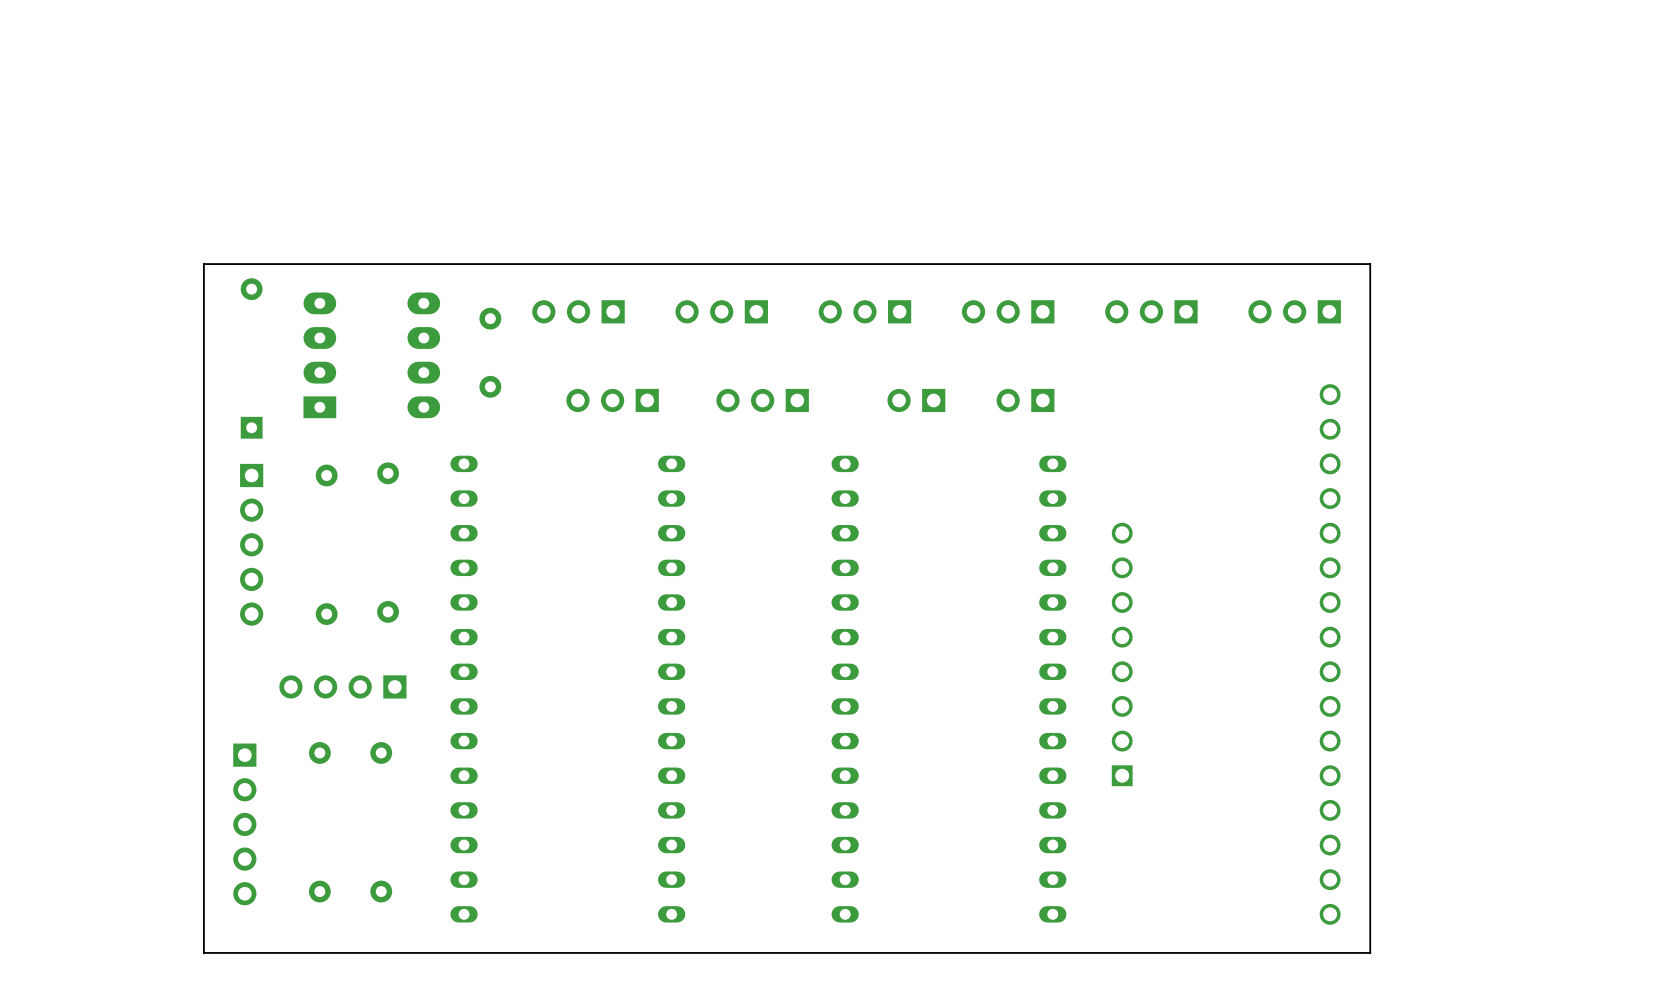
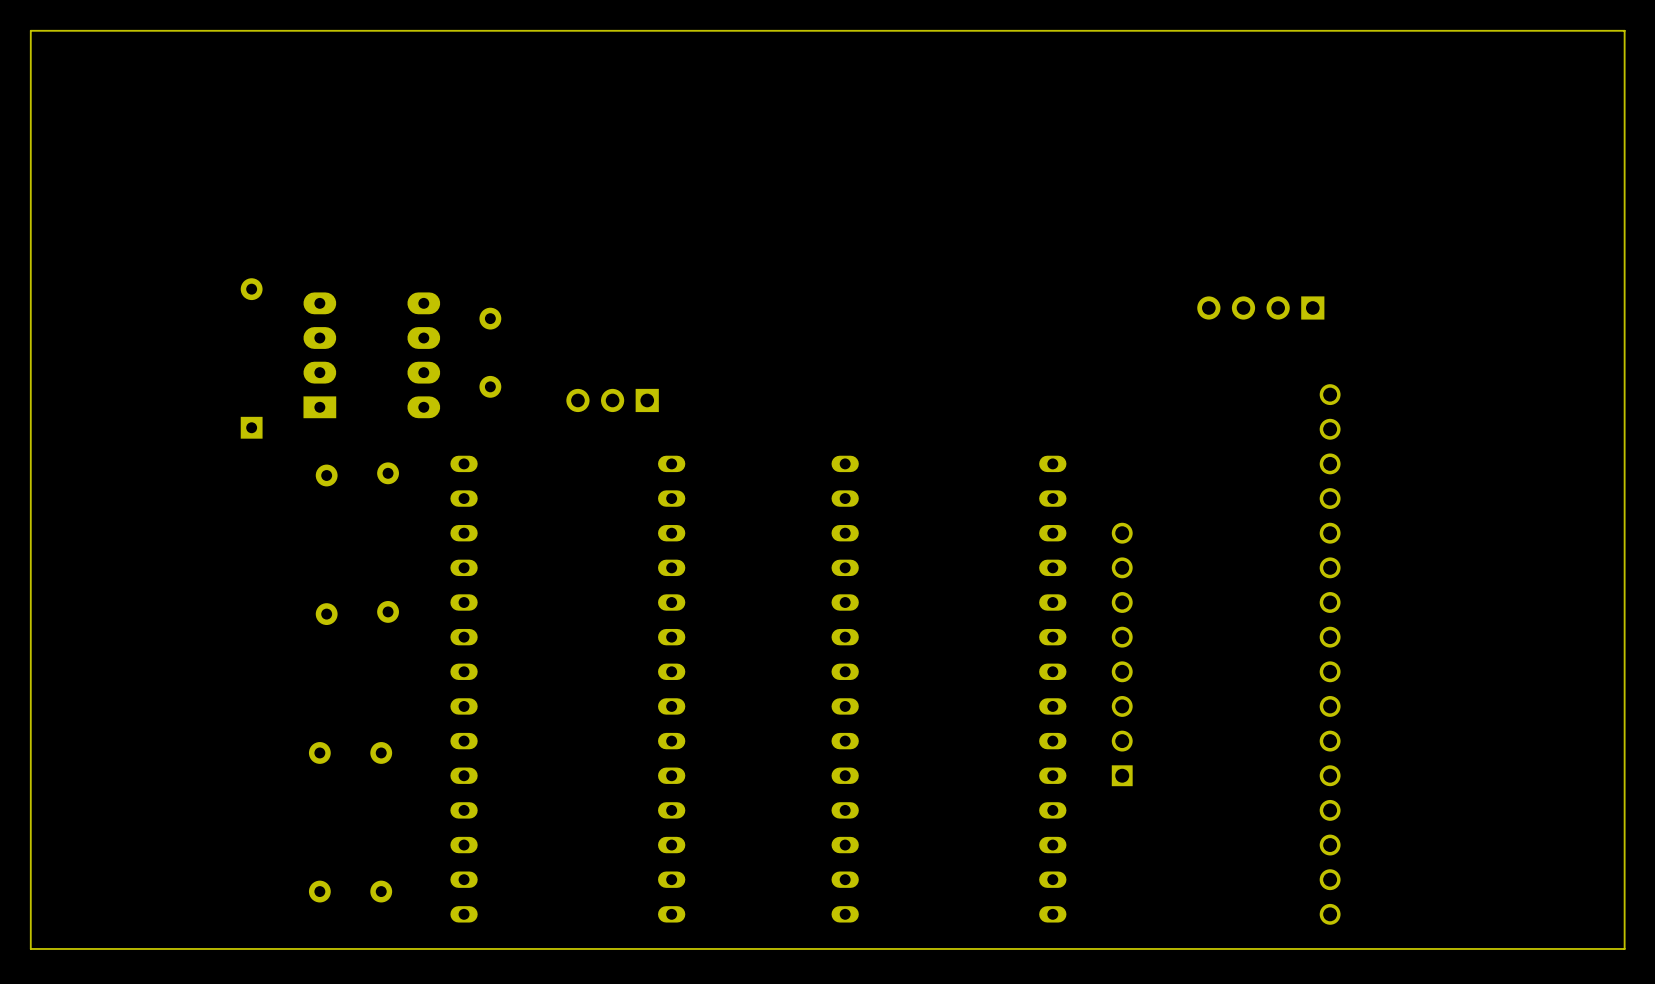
board edge: (1370, 264) (203, 264) (203, 952) (1370, 952) (1370, 264) -> (1624, 30) (1624, 948) (30, 948) (30, 30) (1624, 30)
part: none -> (1260, 307)
part: (578, 311) -> none
part: (721, 311) -> none
part: (864, 311) -> none
part: (1008, 311) -> none
part: (1151, 311) -> none
part: (1294, 311) -> none
part: (762, 400) -> none
part: (916, 400) -> none
part: (1025, 400) -> none
part: (251, 544) -> none
part: (342, 686) -> none
part: (244, 824) -> none

